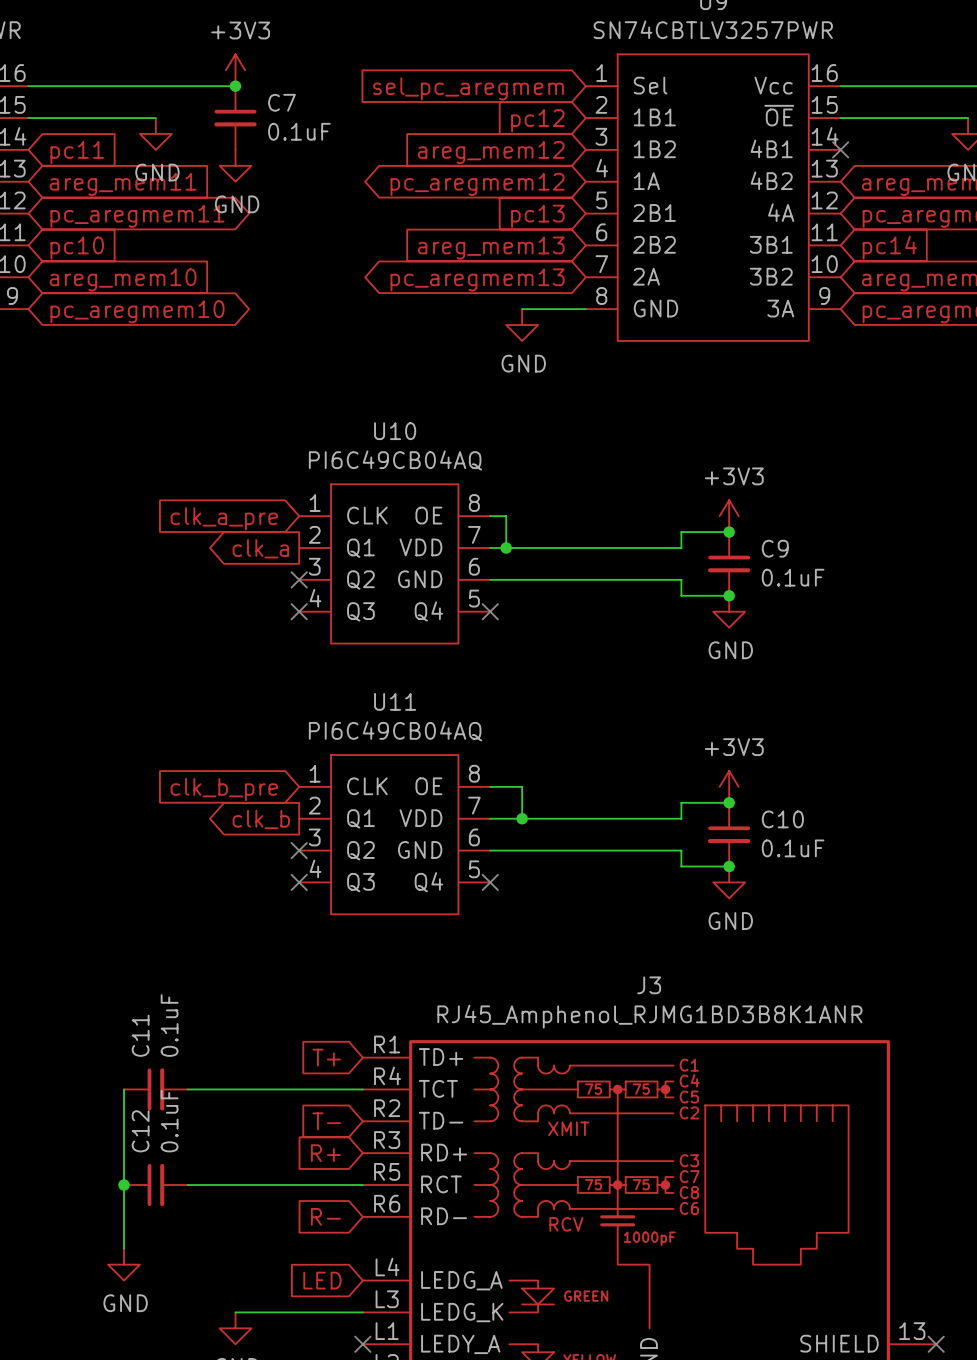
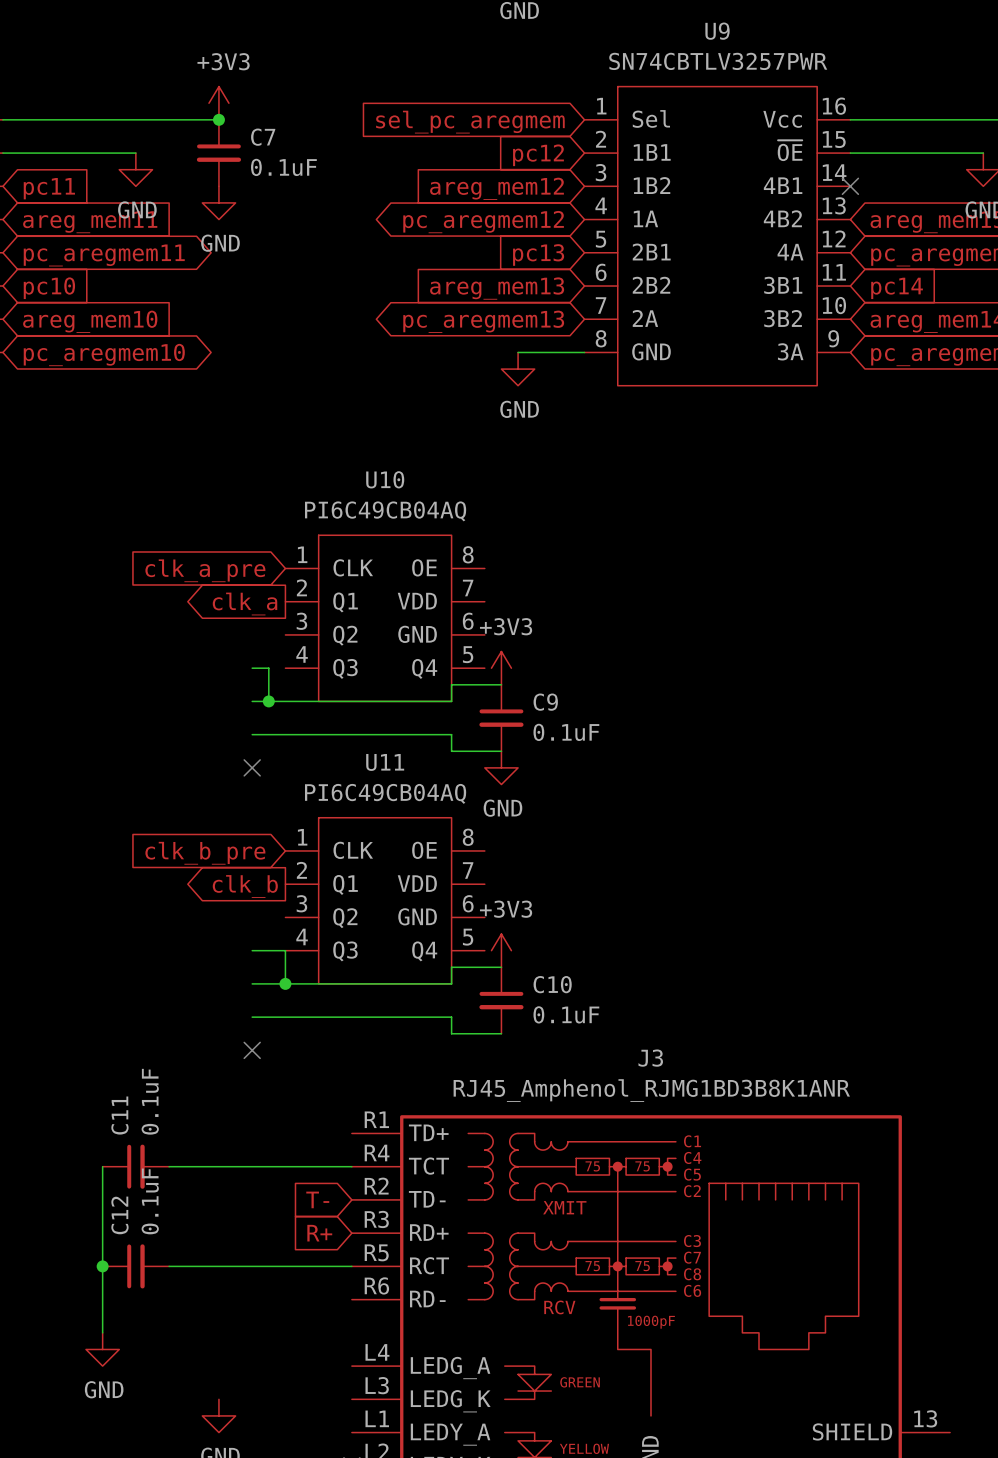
wire: (490, 516) (506, 516) (506, 548) -> (252, 668) (268, 668) (268, 701)
power symbol: +3V3 (729, 516) -> none
wire: (729, 532) (681, 532) (681, 548) (490, 548) -> (501, 684) (451, 684) (451, 701) (252, 701)
junction: (729, 532) -> none
junction: (506, 548) -> none
C9 position: (729, 563) -> (501, 718)
no-connect mark: (299, 579) -> none
wire: (490, 579) (681, 579) (681, 595) (729, 595) -> (252, 734) (451, 734) (451, 751) (501, 751)
junction: (729, 595) -> none
no-connect mark: (299, 611) -> none
no-connect mark: (490, 611) -> none
power symbol: none -> +3V3 (501, 668)
power symbol: GND (729, 611) -> none
junction: none -> (268, 701)
no-connect mark: none -> (252, 767)
power symbol: none -> GND (501, 767)
wire: (490, 786) (522, 786) (522, 818) -> (252, 950) (285, 950) (285, 983)
power symbol: +3V3 (729, 786) -> none
wire: (729, 802) (681, 802) (681, 818) (490, 818) -> (501, 967) (451, 967) (451, 983) (252, 983)
junction: (729, 802) -> none
junction: (522, 818) -> none
C10 position: (729, 834) -> (501, 1000)
no-connect mark: (299, 850) -> none
wire: (490, 850) (681, 850) (681, 866) (729, 866) -> (252, 1017) (451, 1017) (451, 1033) (501, 1033)
junction: (729, 866) -> none
no-connect mark: (299, 882) -> none
no-connect mark: (490, 882) -> none
power symbol: none -> +3V3 (501, 950)
power symbol: GND (729, 882) -> none
junction: none -> (285, 983)
no-connect mark: none -> (252, 1050)
global label: T+ (326, 1057) -> none
global label: R- (325, 1216) -> none
global label: LED (322, 1280) -> none
wire: (235, 1312) (362, 1312) -> none
no-connect mark: (362, 1344) -> none
no-connect mark: (936, 1344) -> none

